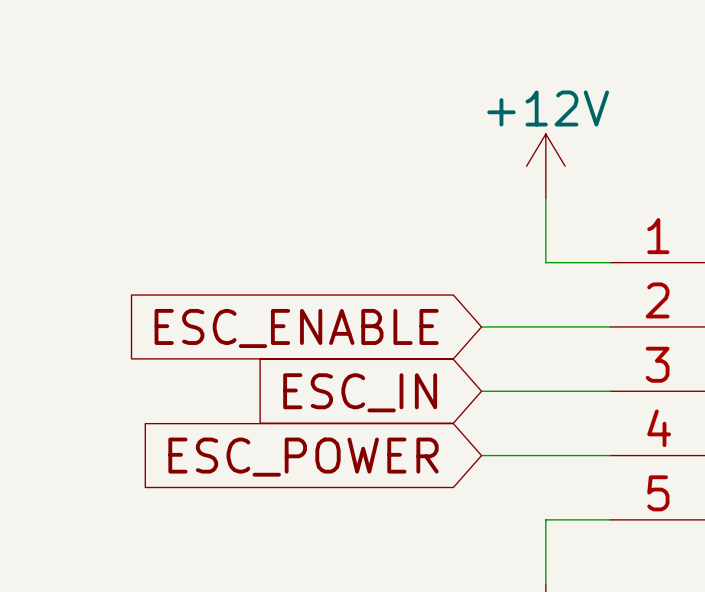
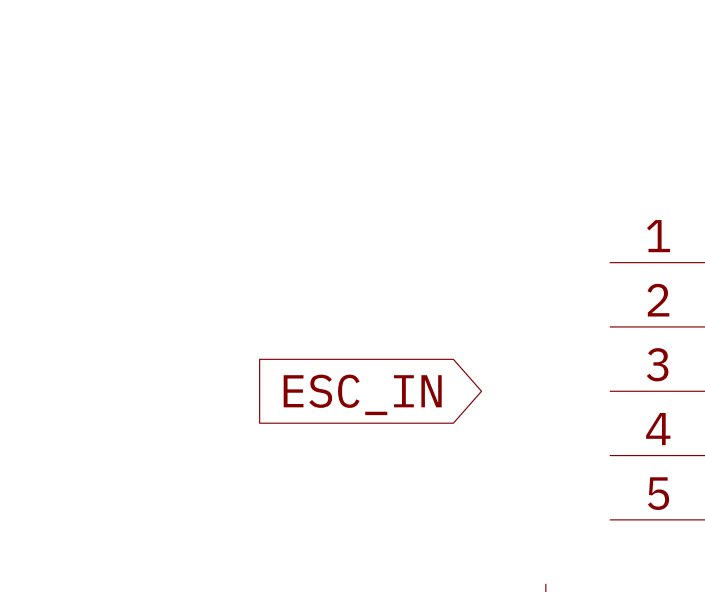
power symbol: +12V (545, 166) -> none
wire: (545, 198) (545, 262) (610, 262) -> none
wire: (481, 326) (610, 326) -> none
global label: ESC_ENABLE (296, 328) -> none
wire: (481, 391) (610, 391) -> none
wire: (481, 455) (610, 455) -> none
global label: ESC_POWER (303, 457) -> none
wire: (610, 519) (545, 519) (545, 584) -> none

